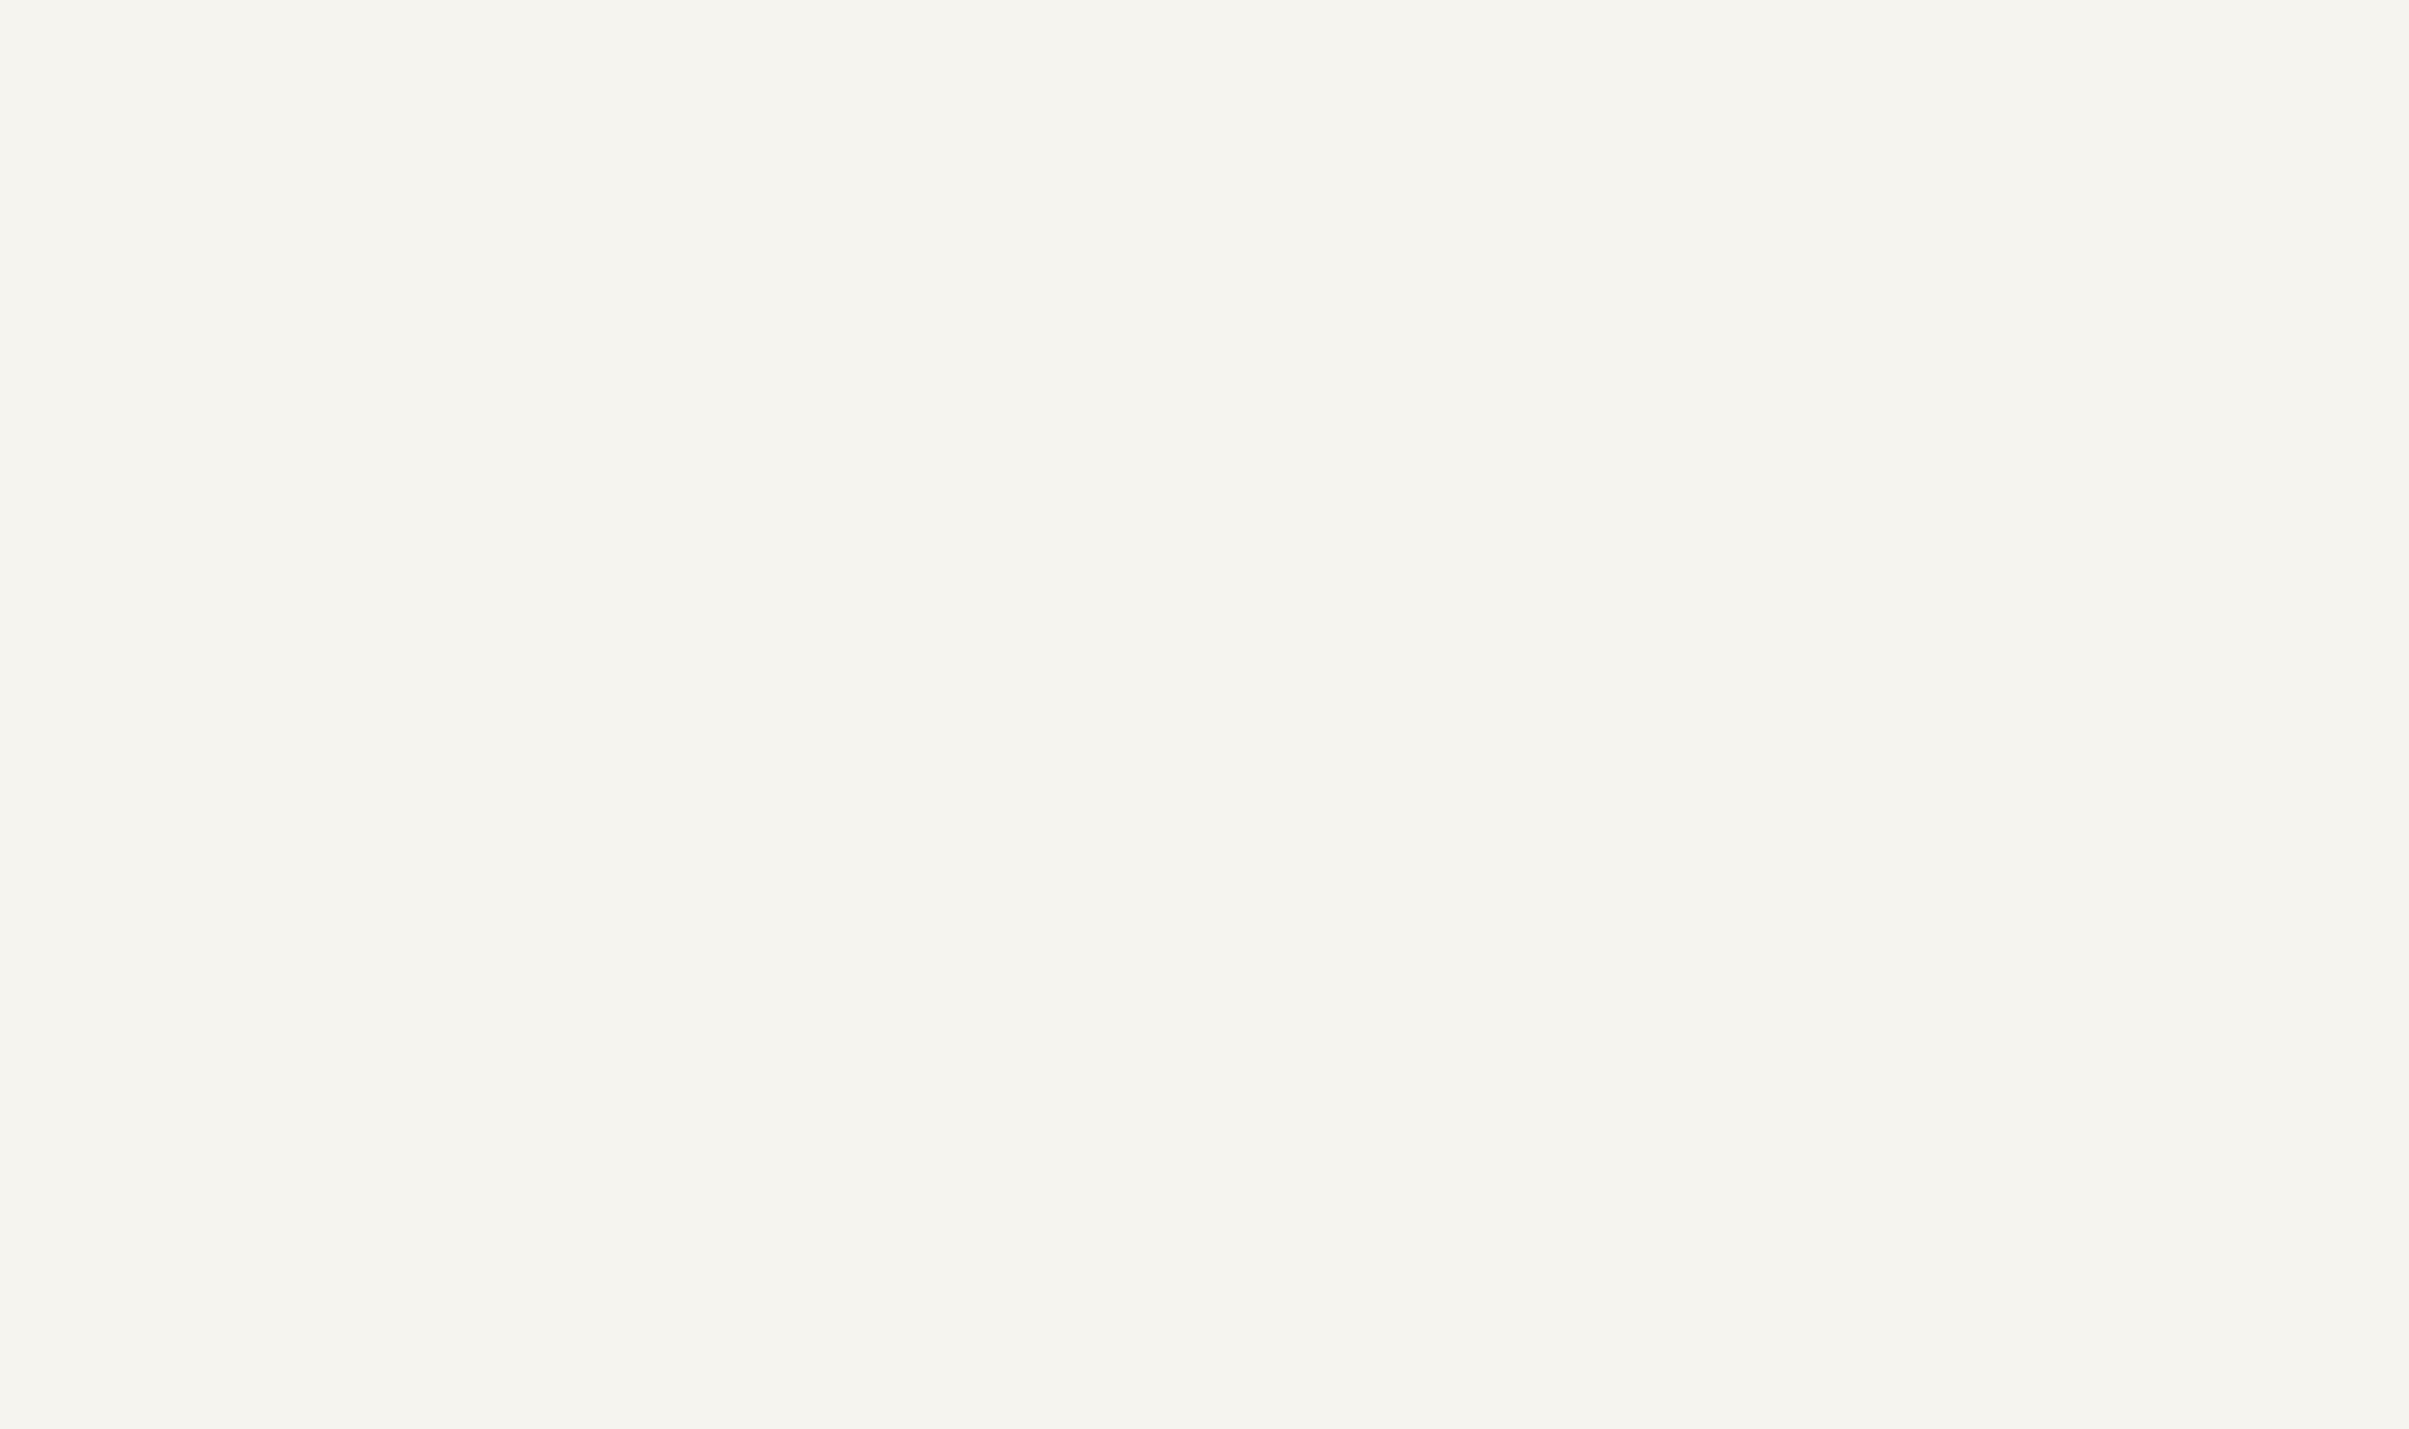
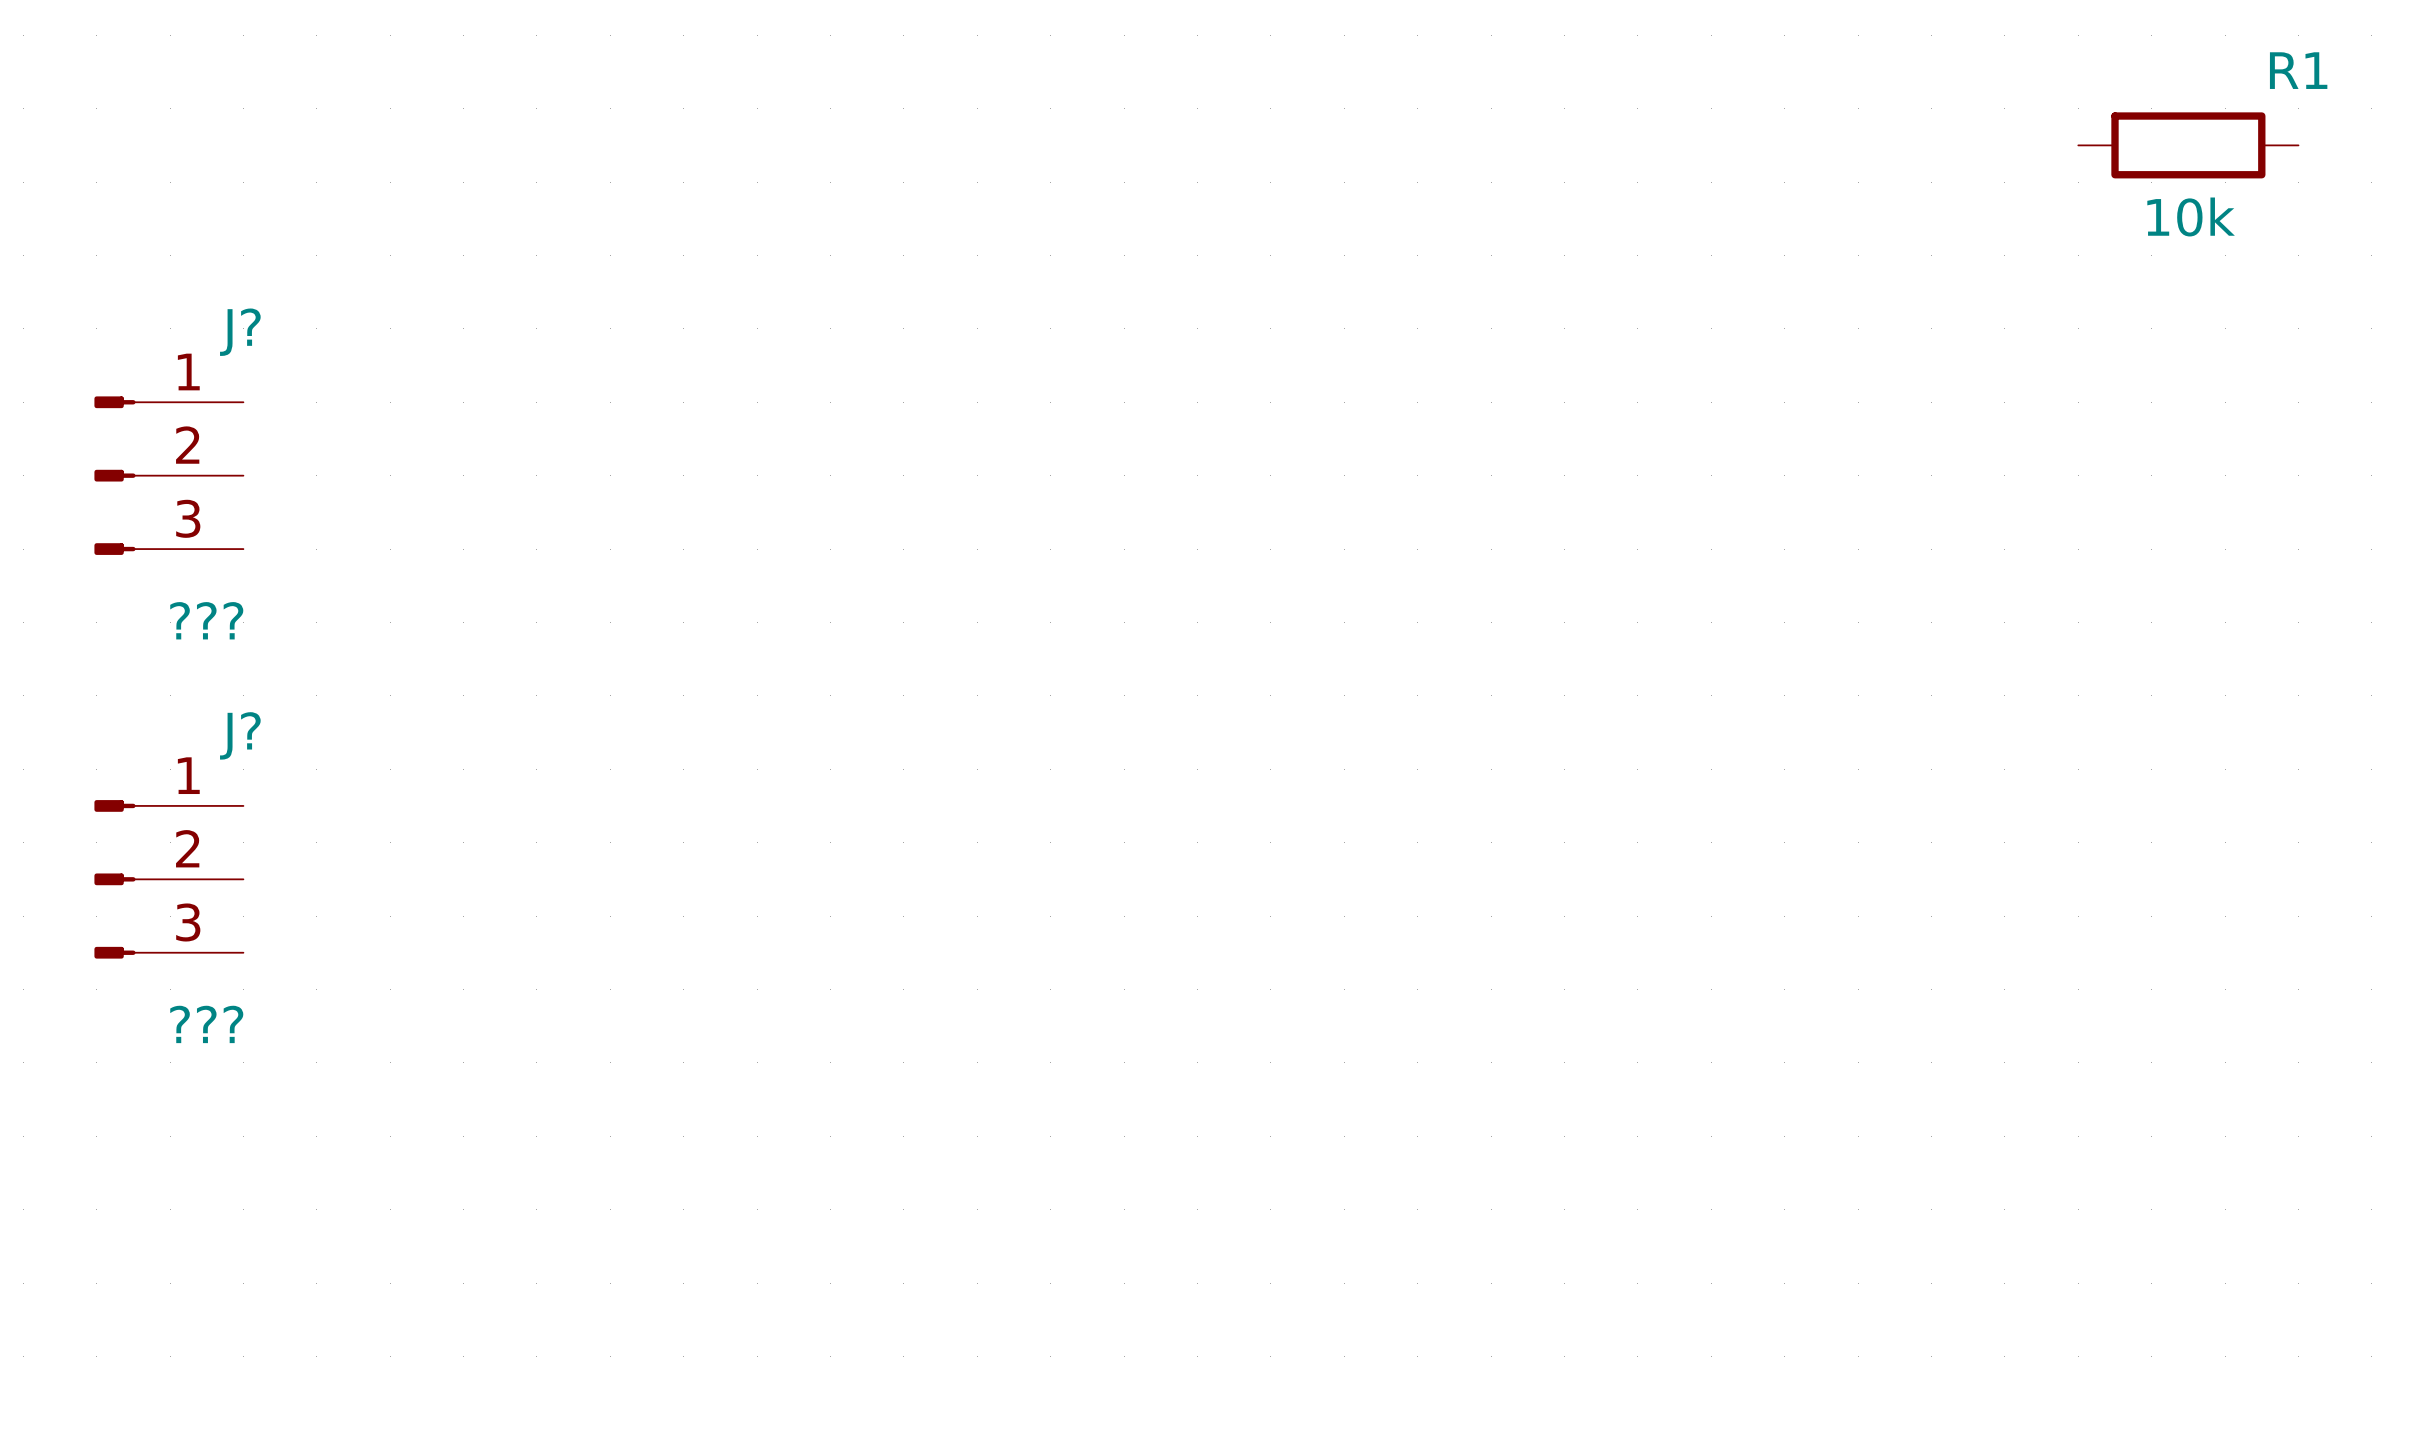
R1: none -> 10k (2188, 145)
J?: none -> ??? (168, 475)
J?: none -> ??? (168, 879)

